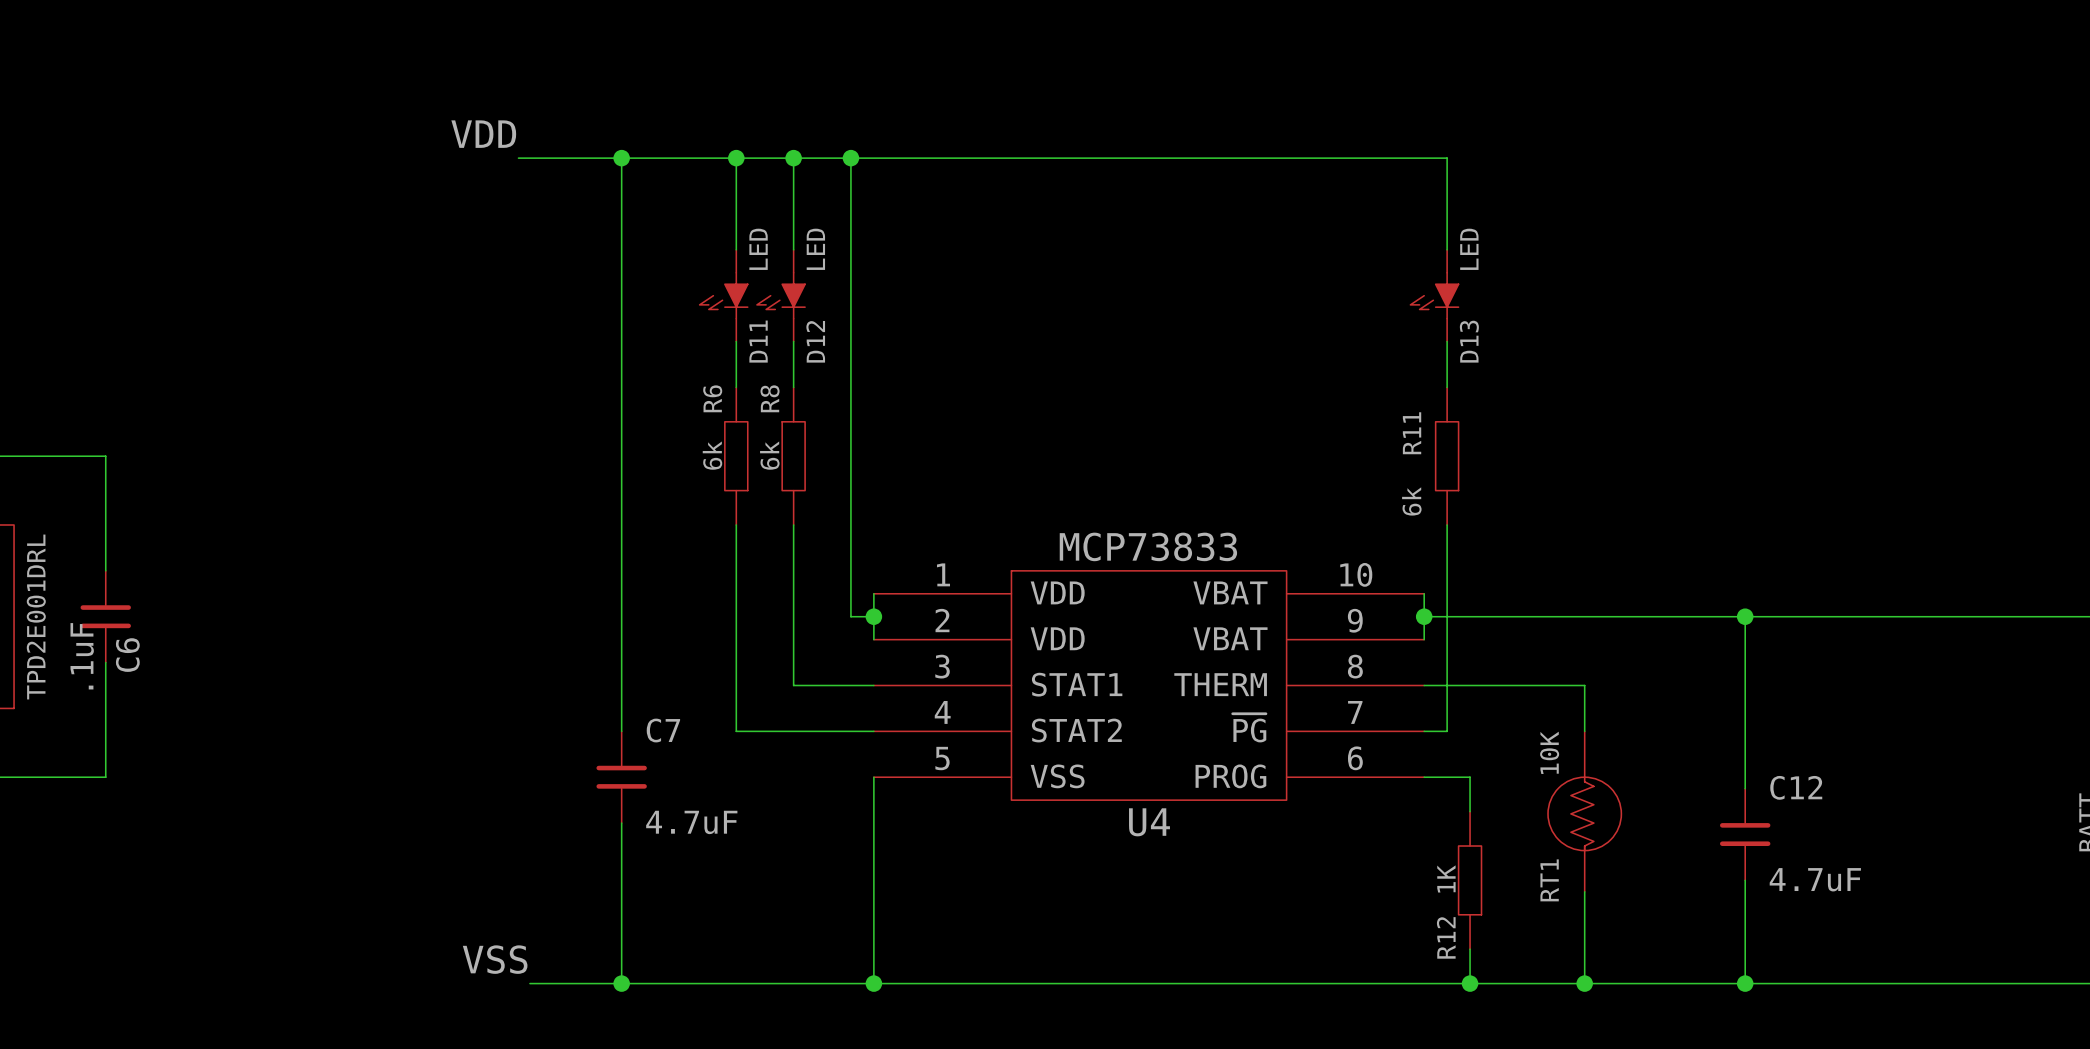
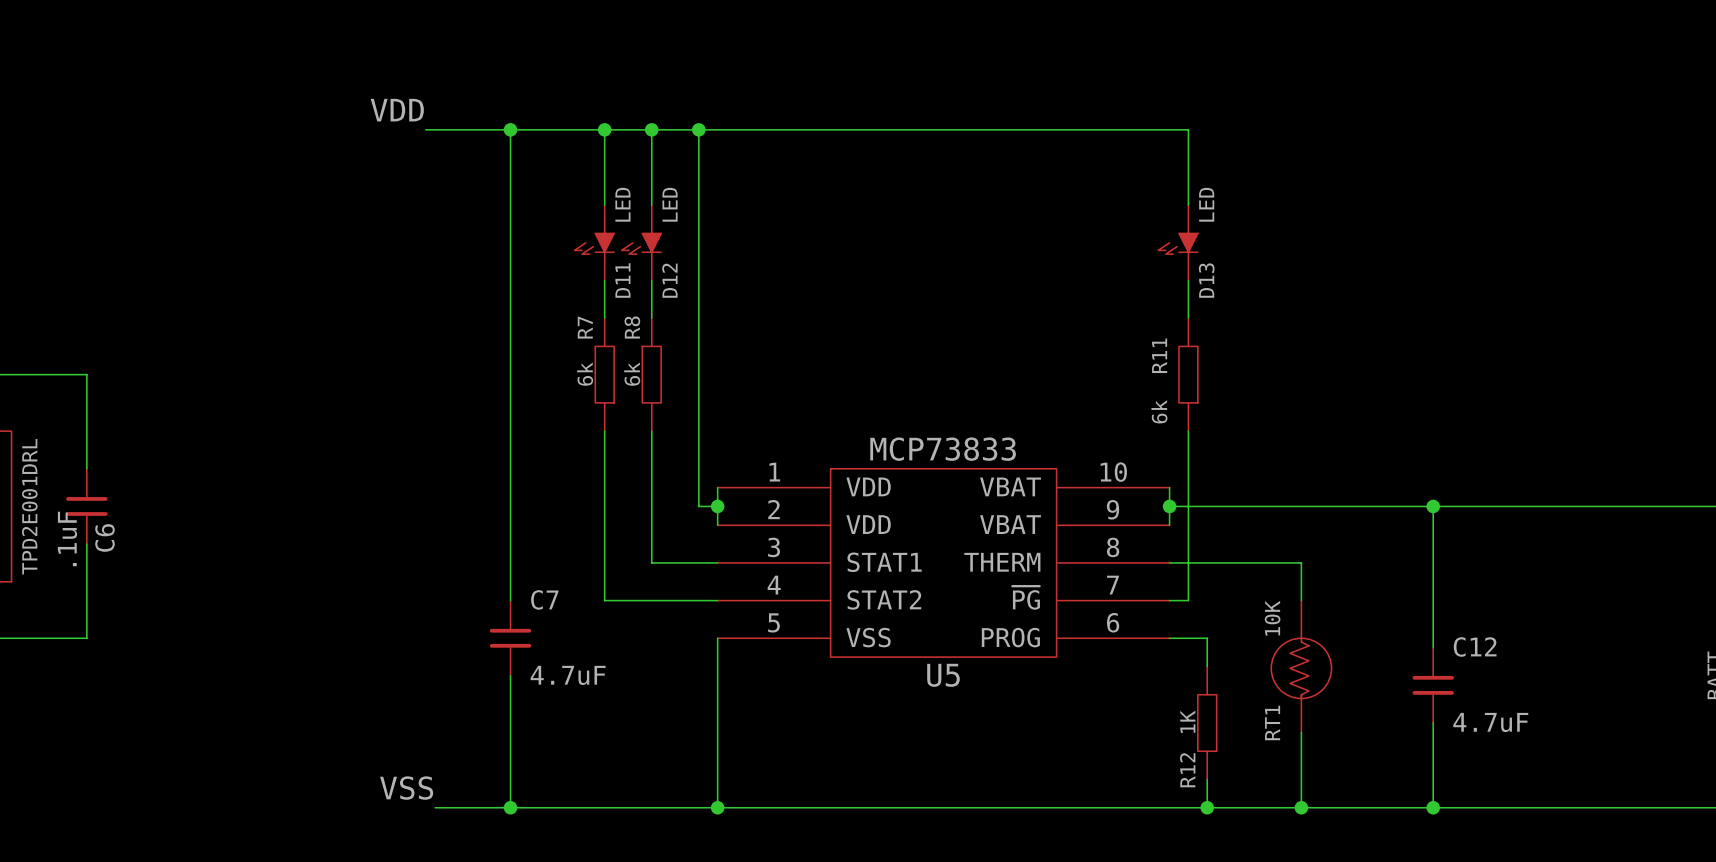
R6 name: R6 (712, 398) -> R7 (585, 327)
U4 name: U4 (1149, 822) -> U5 (943, 675)

